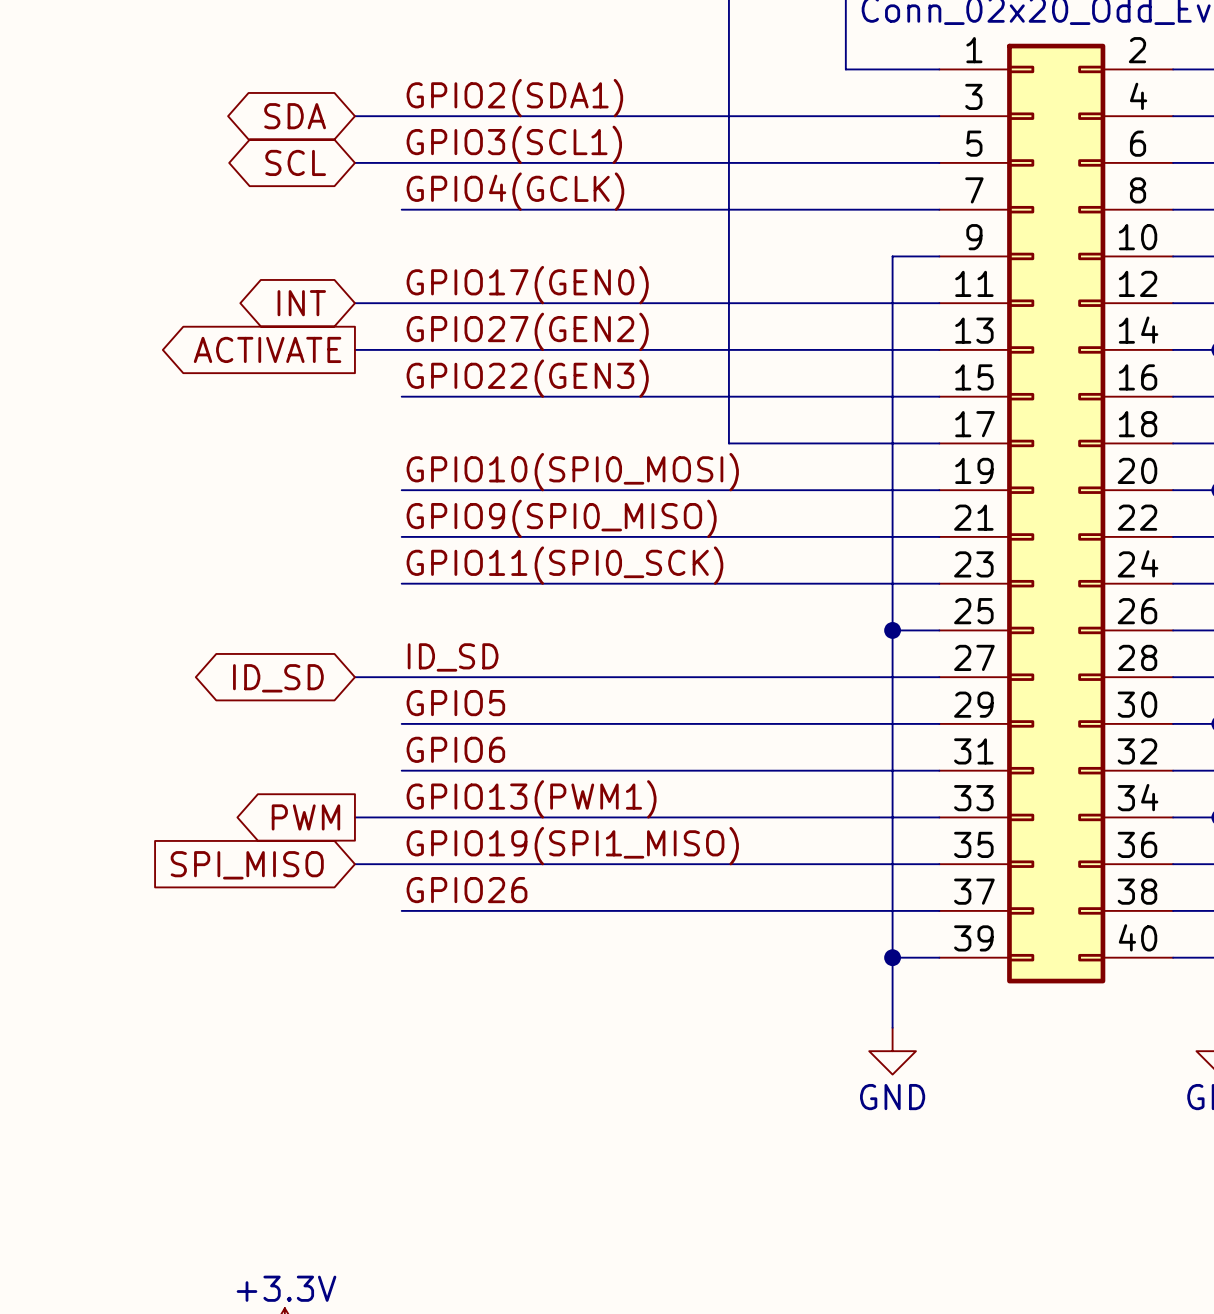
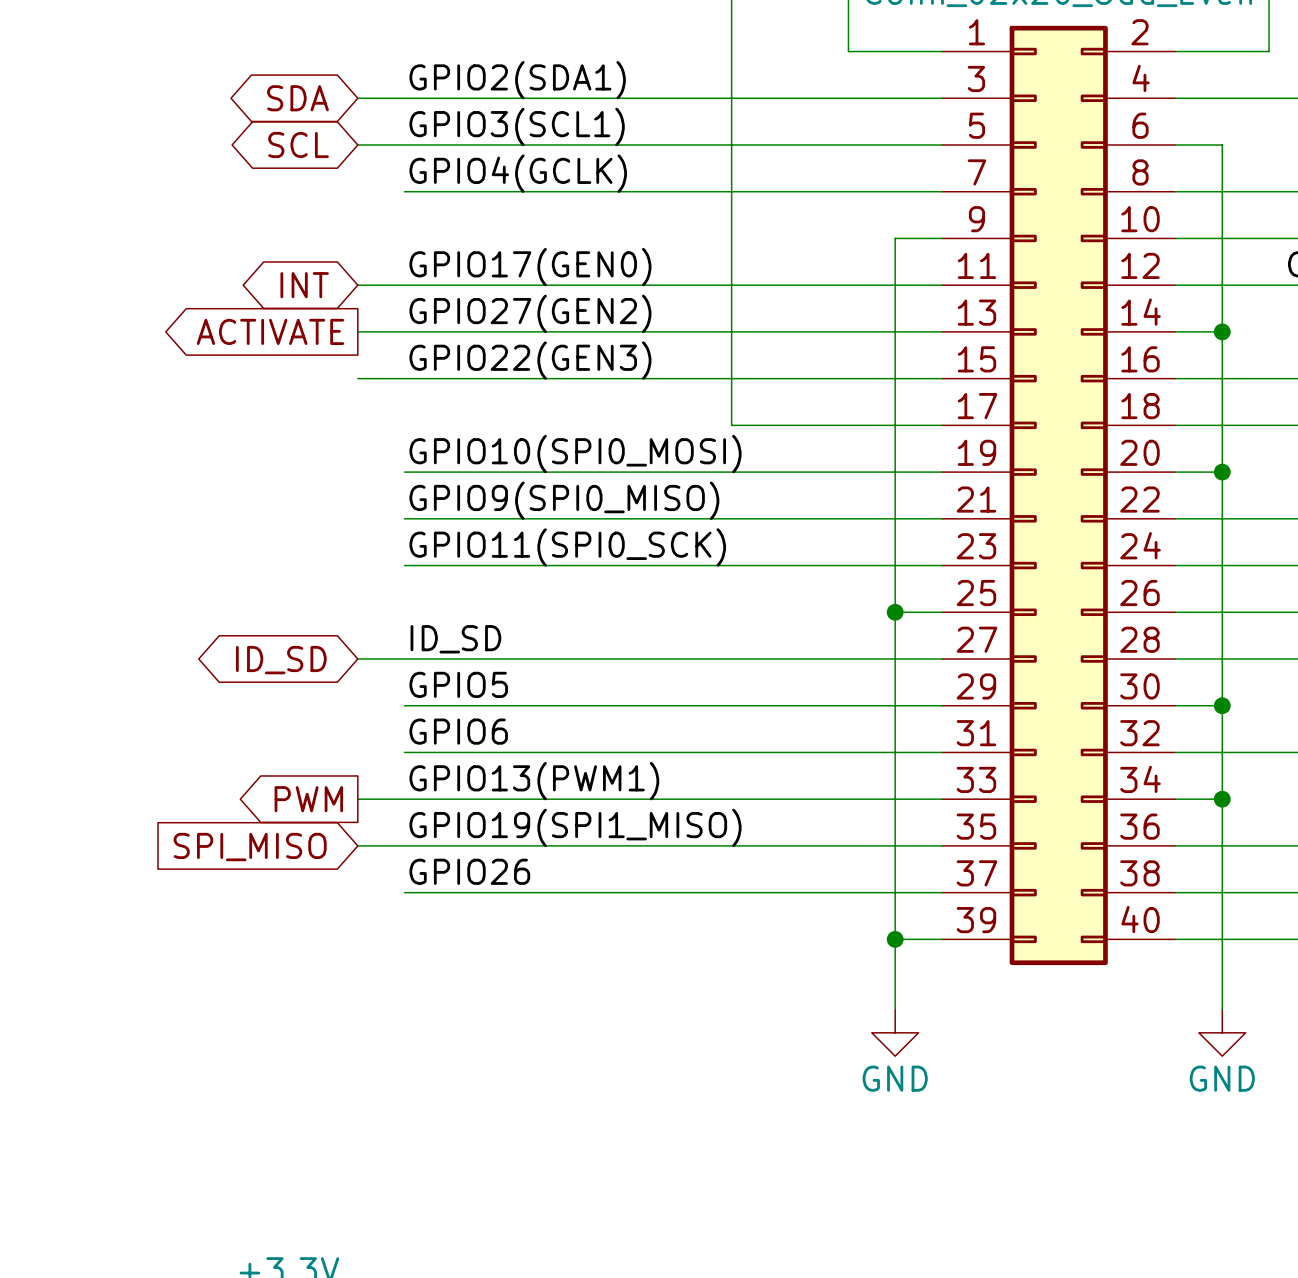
wire: none -> (357, 378) (404, 378)

